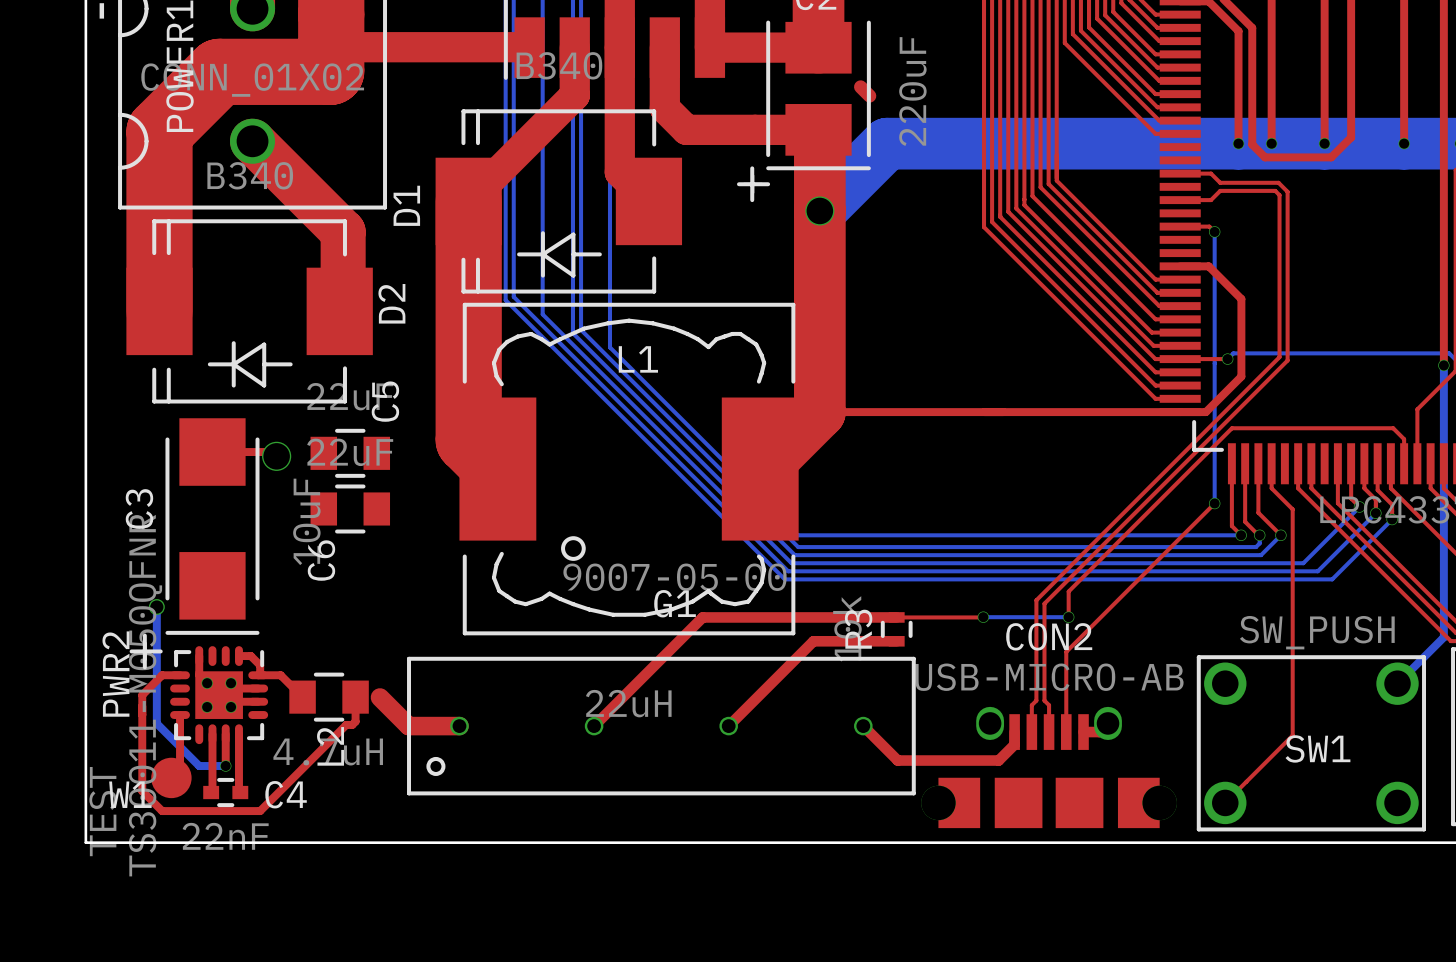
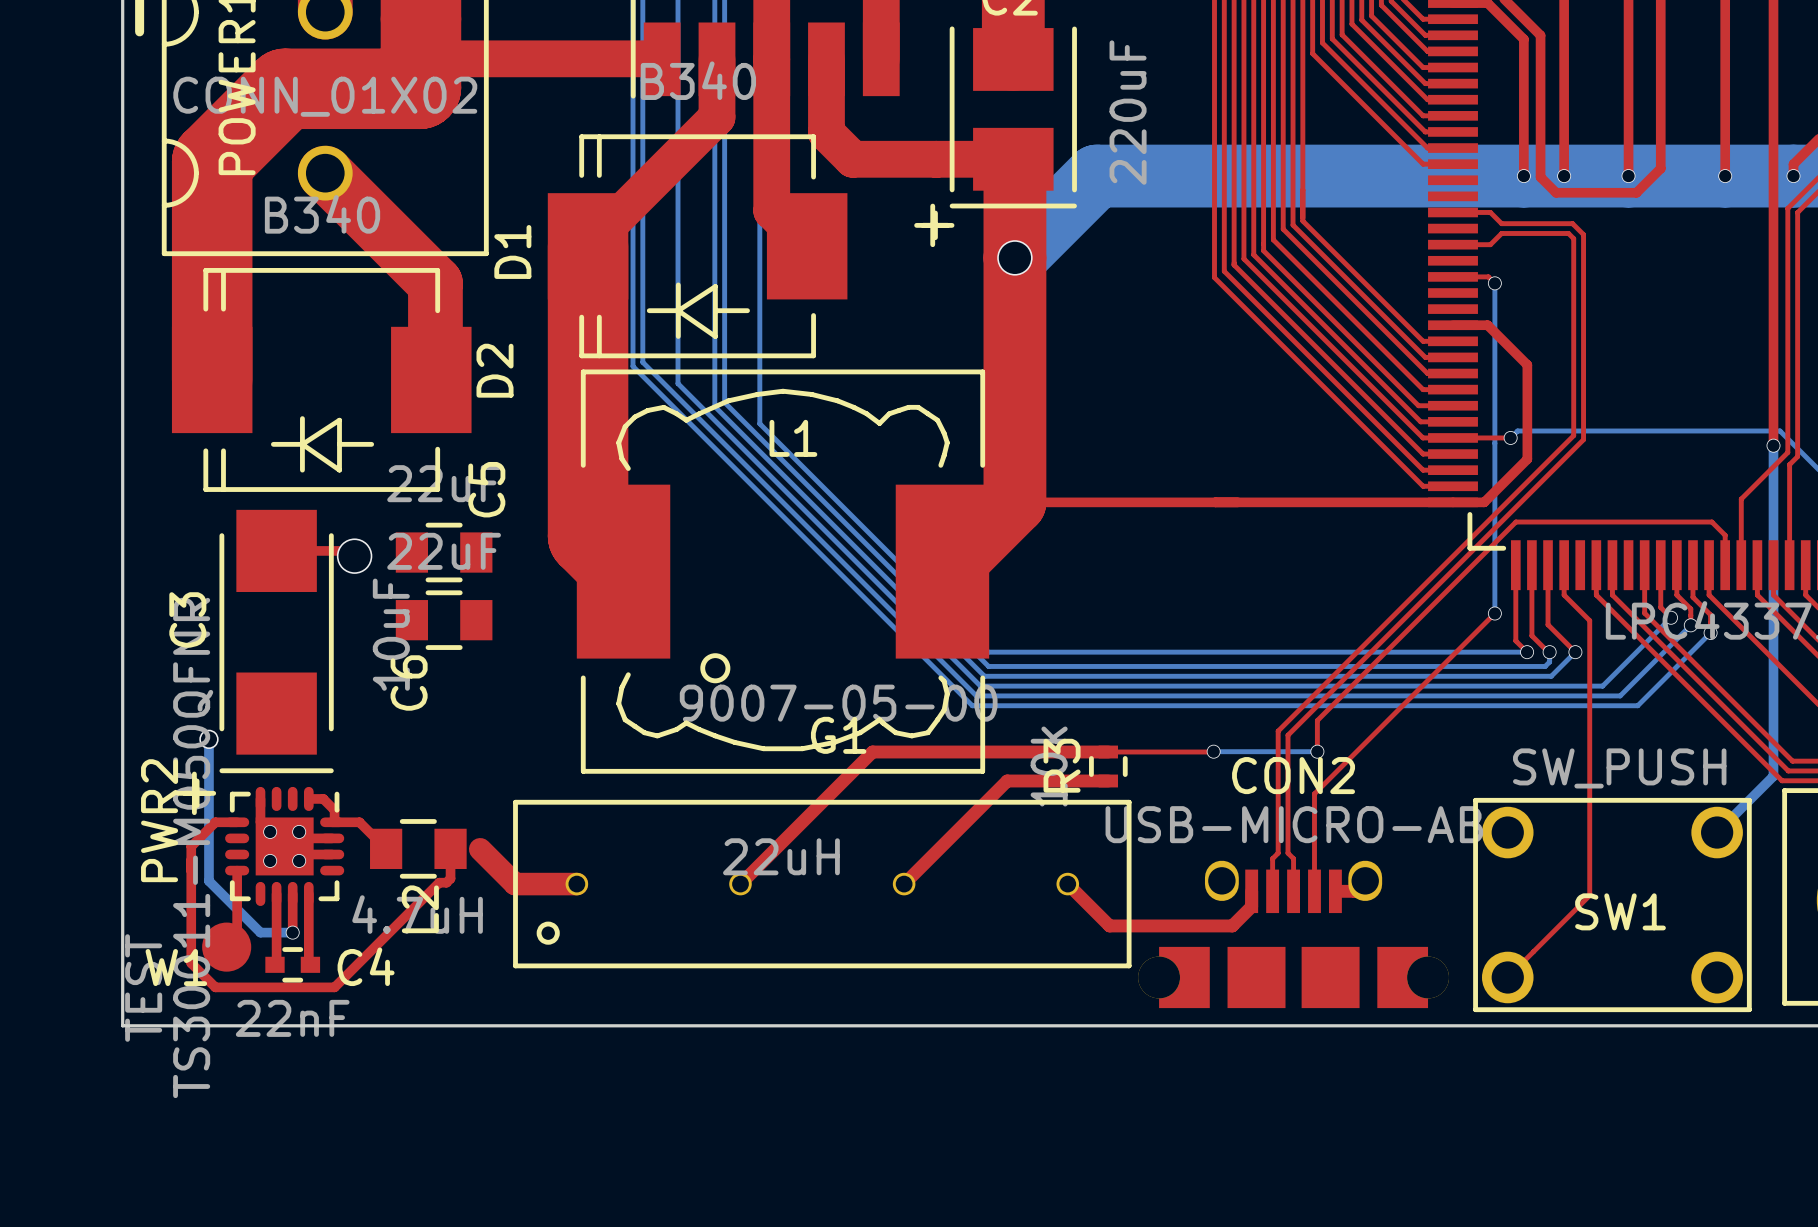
top track: (709, 47) (818, 47) -> none
top track: (860, 86) (869, 95) -> none

